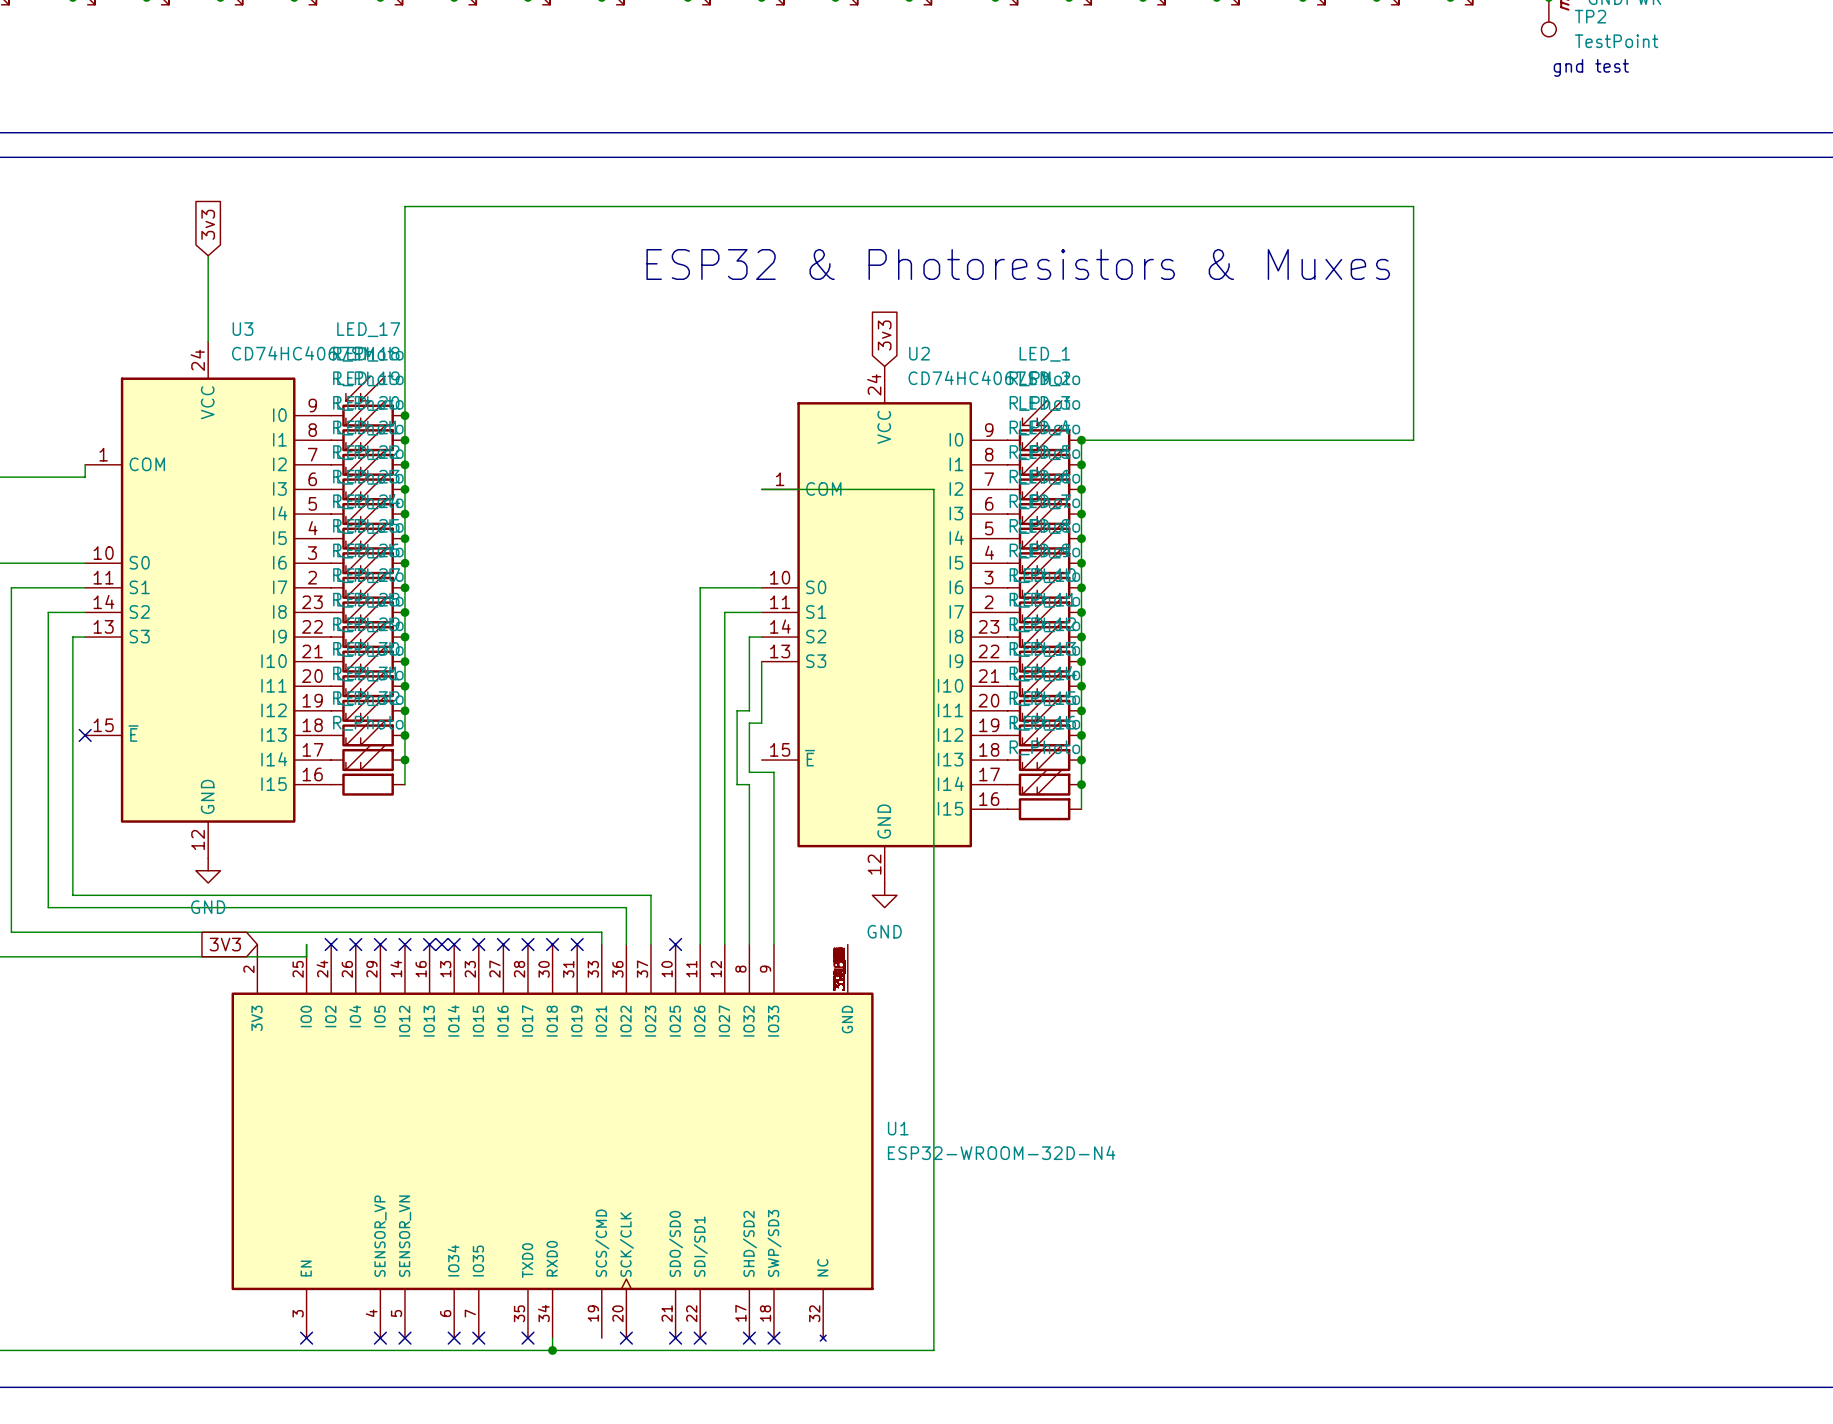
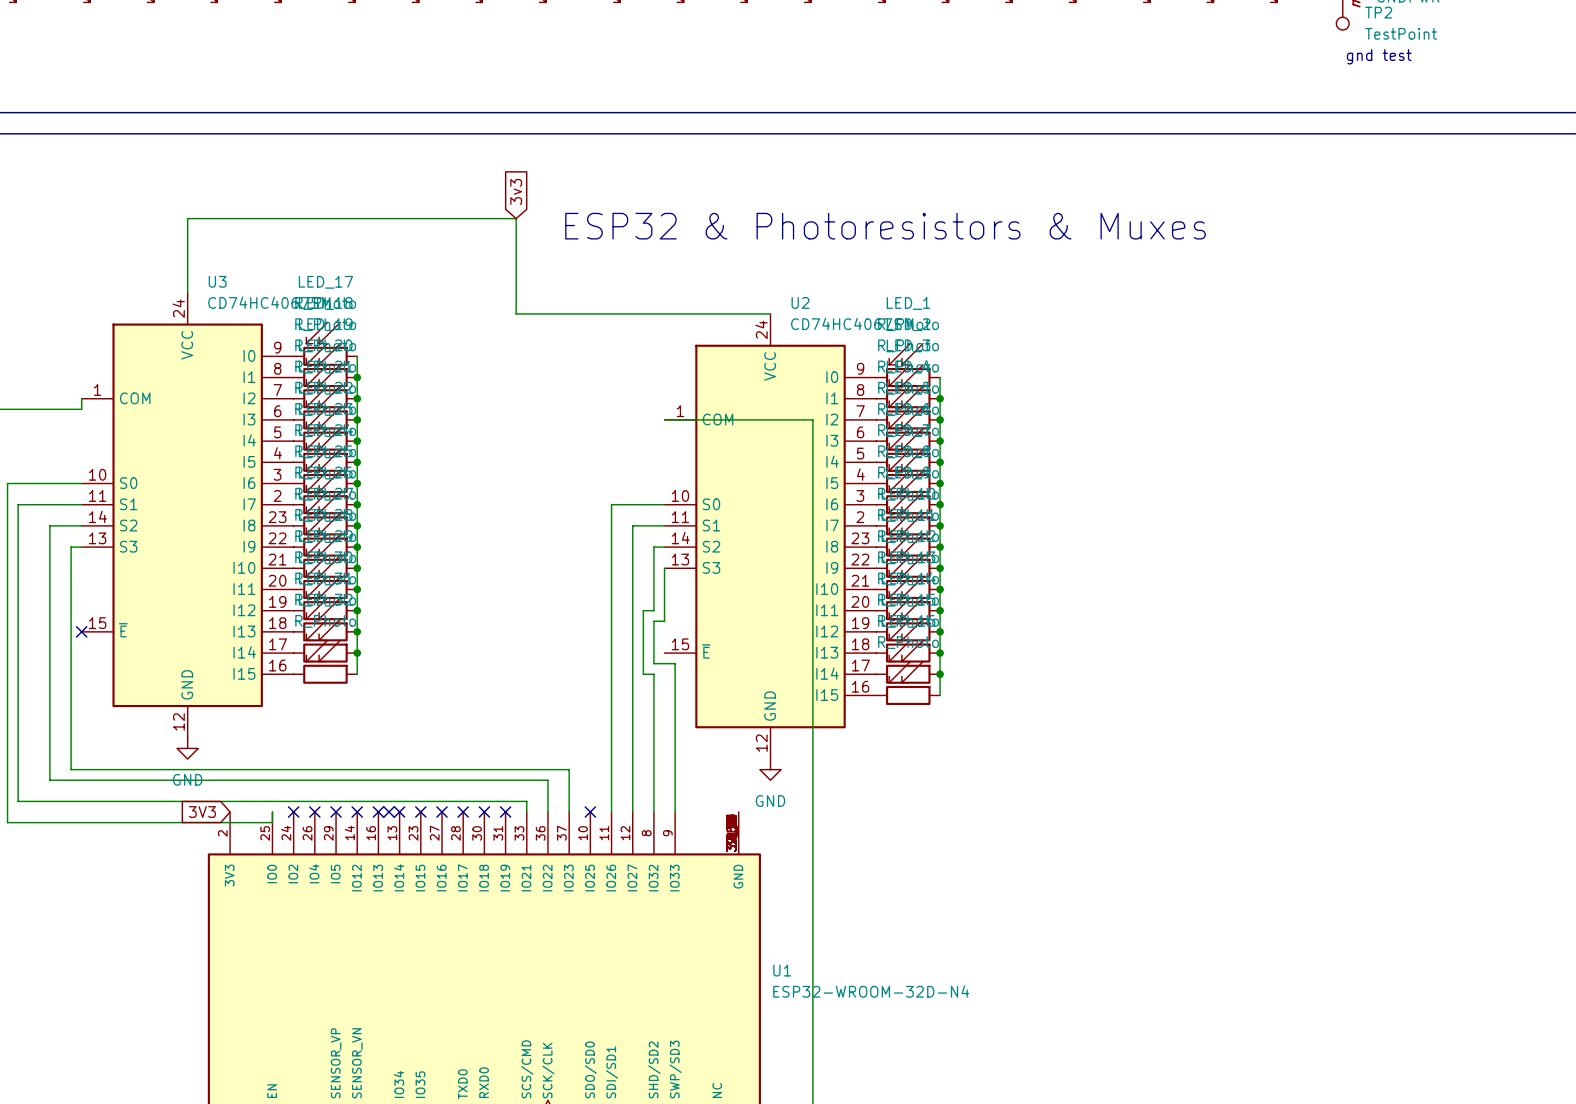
global label: 3v3 (208, 224) -> none
global label: none -> 3v3 (516, 191)
wire: none -> (187, 218) (516, 218) (516, 313) (770, 313)
global label: 3v3 (884, 335) -> none
wire: (404, 415) (404, 206) (1413, 206) (1413, 440) (1081, 440) -> none
junction: (404, 415) -> none
junction: (1081, 440) -> none

